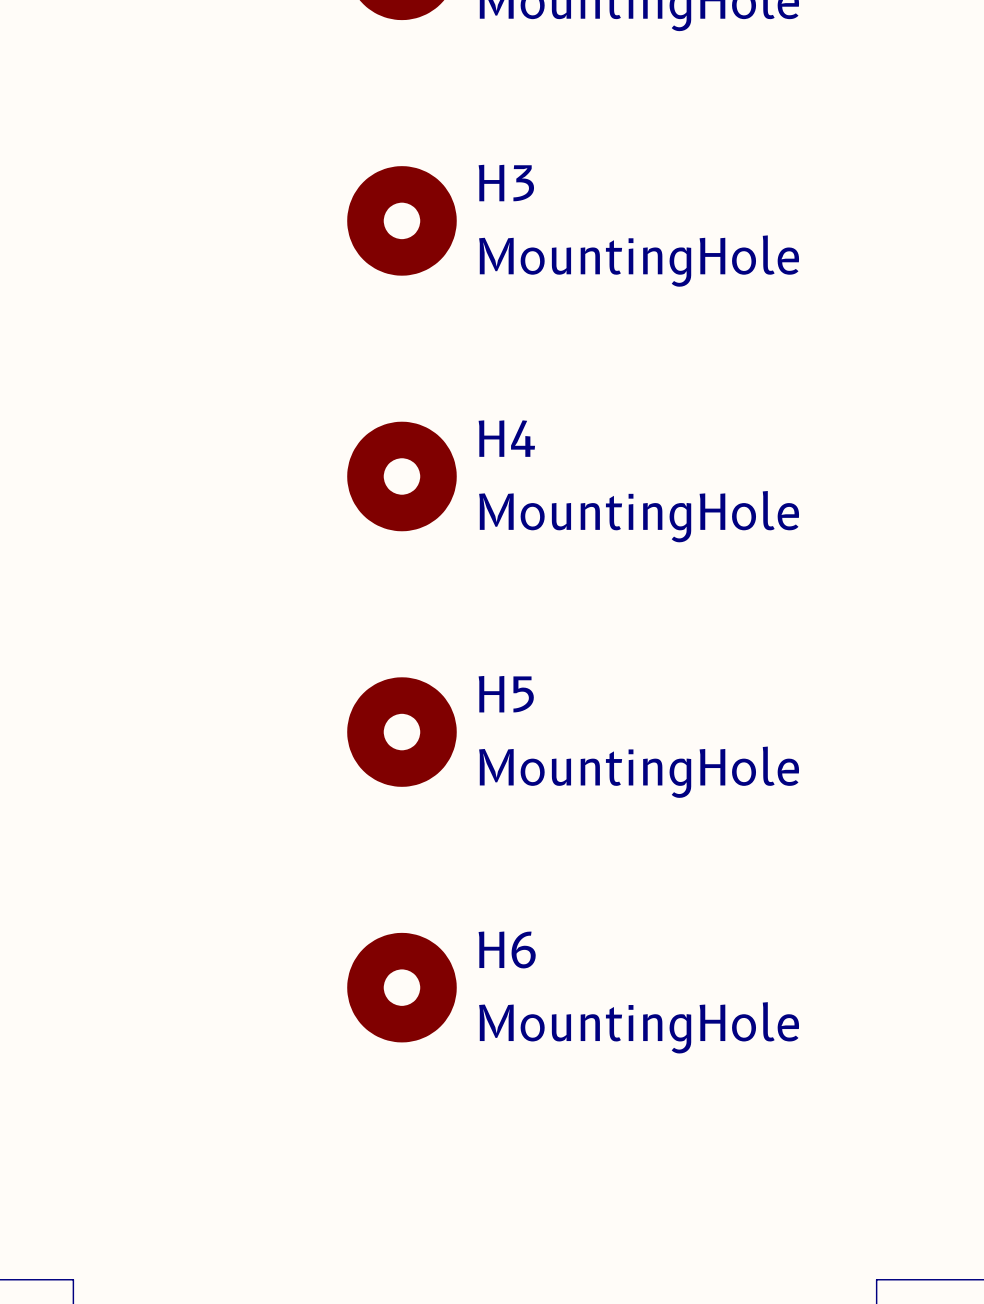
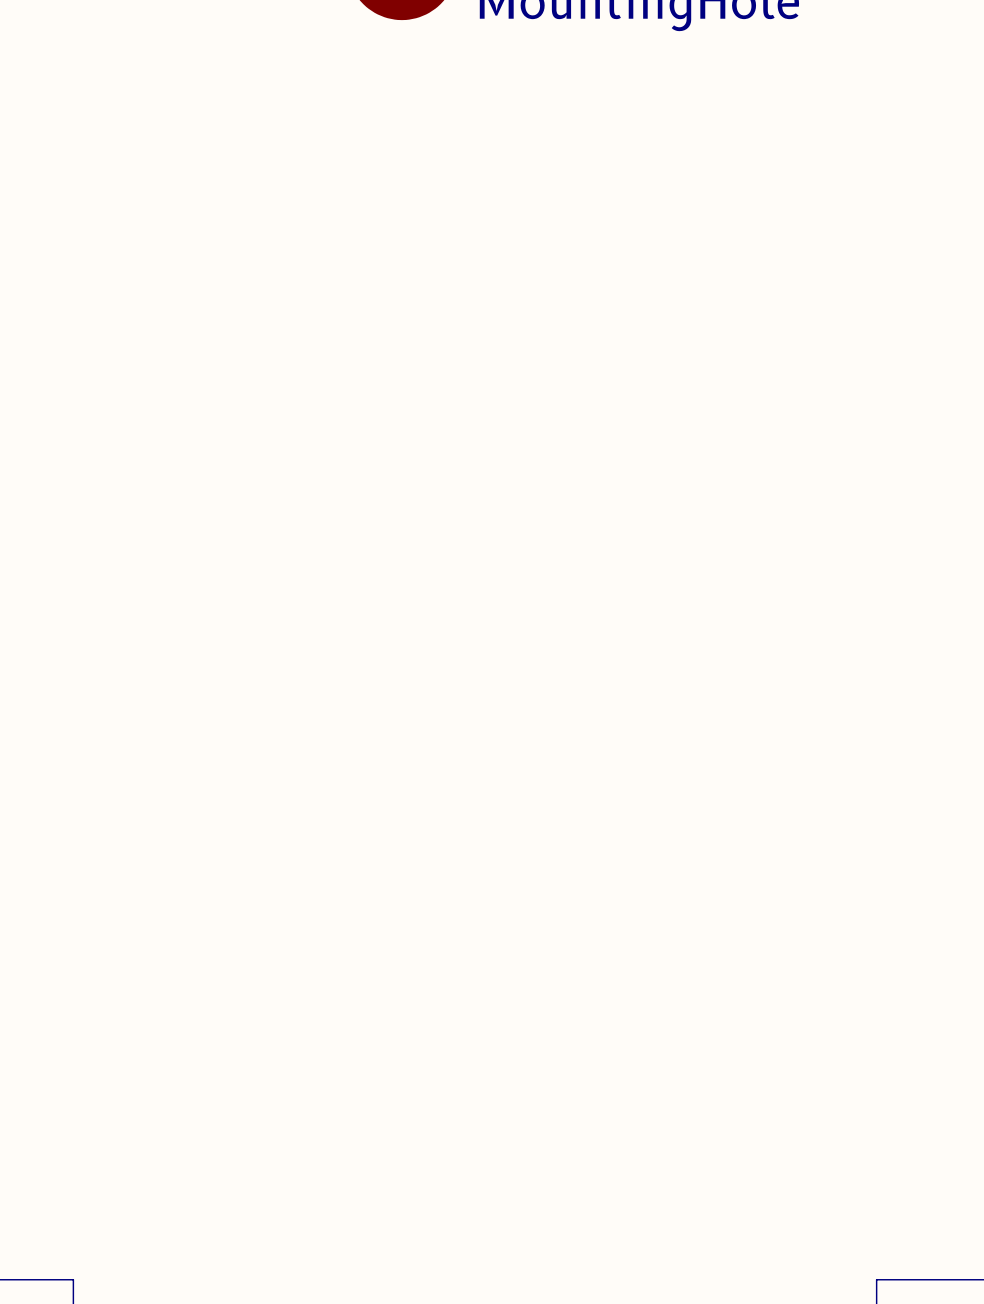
H3: MountingHole (401, 220) -> none
H4: MountingHole (401, 476) -> none
H5: MountingHole (401, 732) -> none
H6: MountingHole (401, 987) -> none

